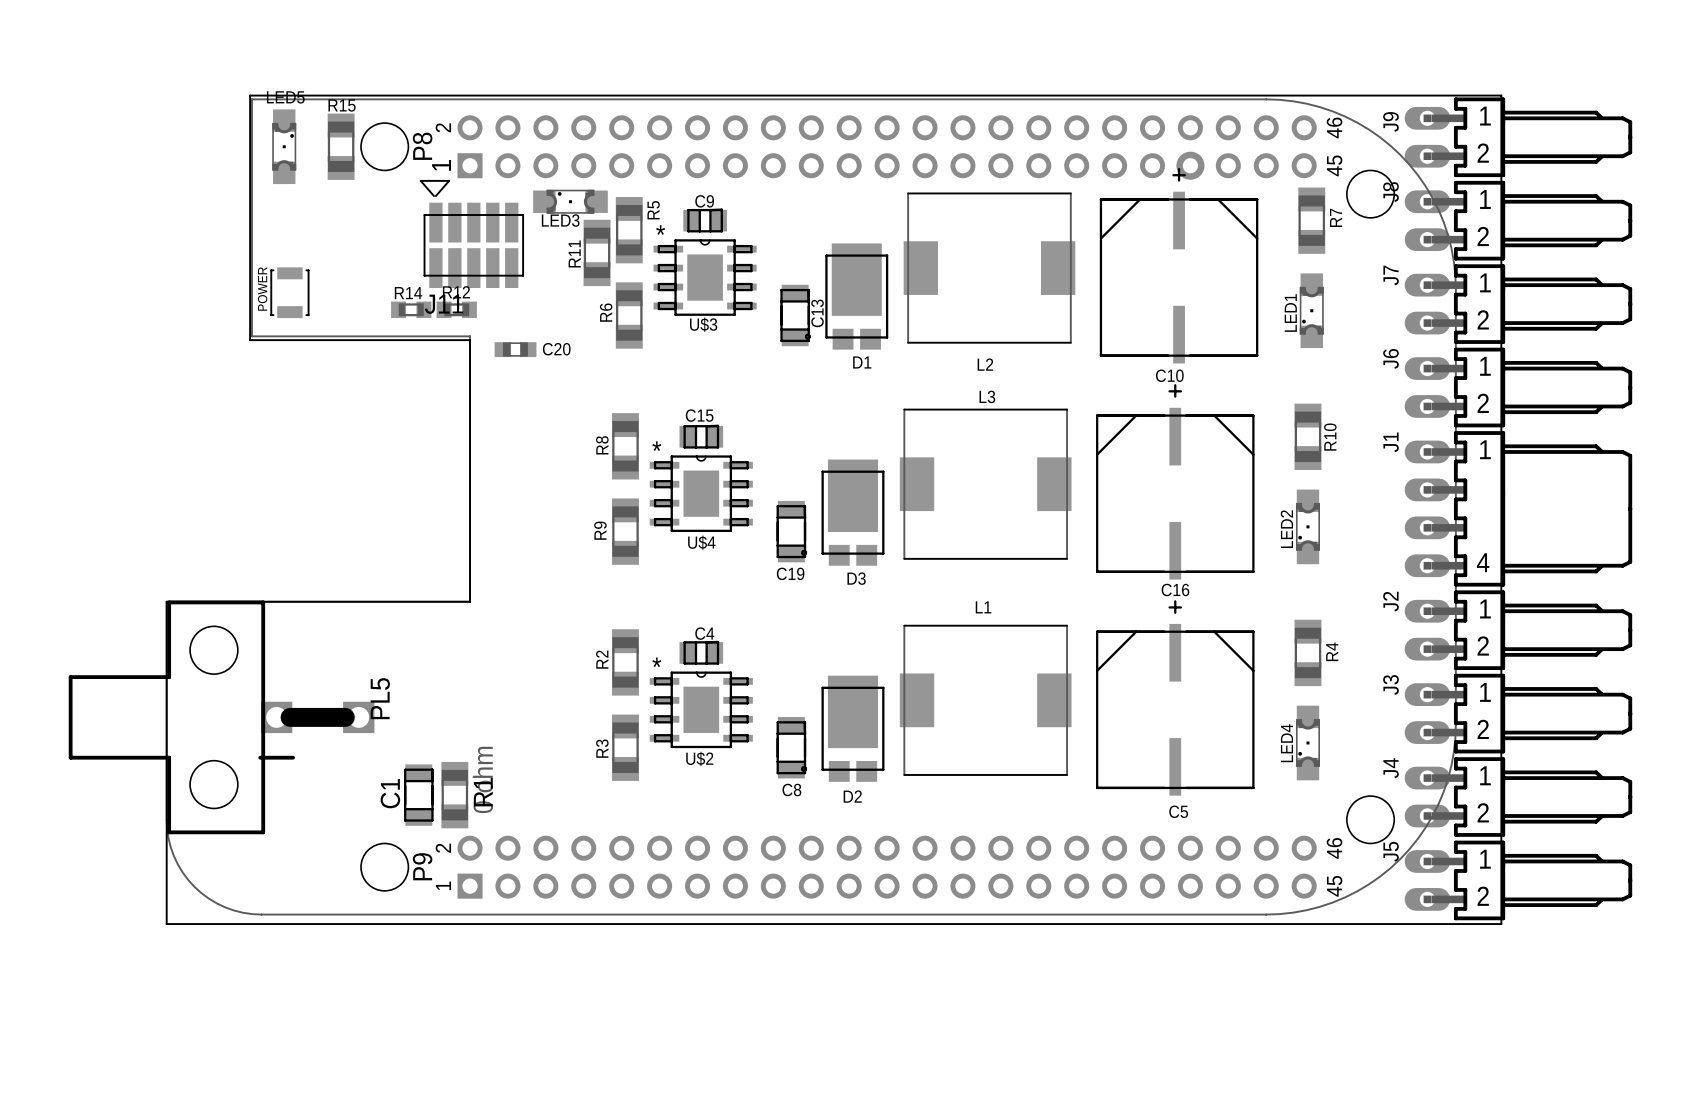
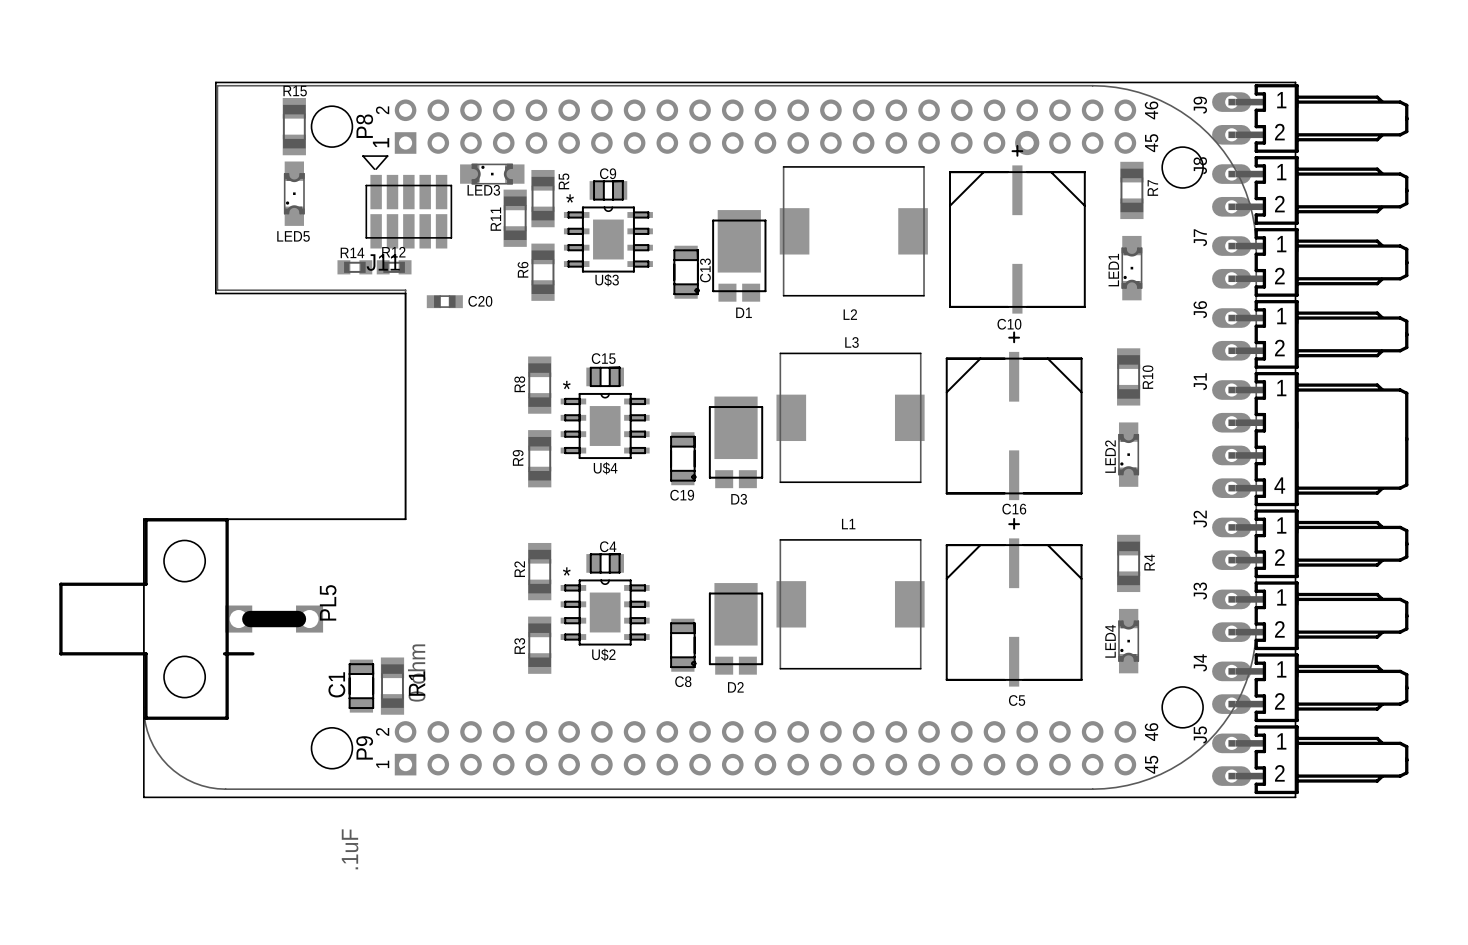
LED5 rotation: 0° (284, 146) -> 180° (294, 193)
LED5 position: (284, 146) -> (294, 193)
POWER: (289, 292) -> none
C1 value: none -> .1uF (350, 849)

